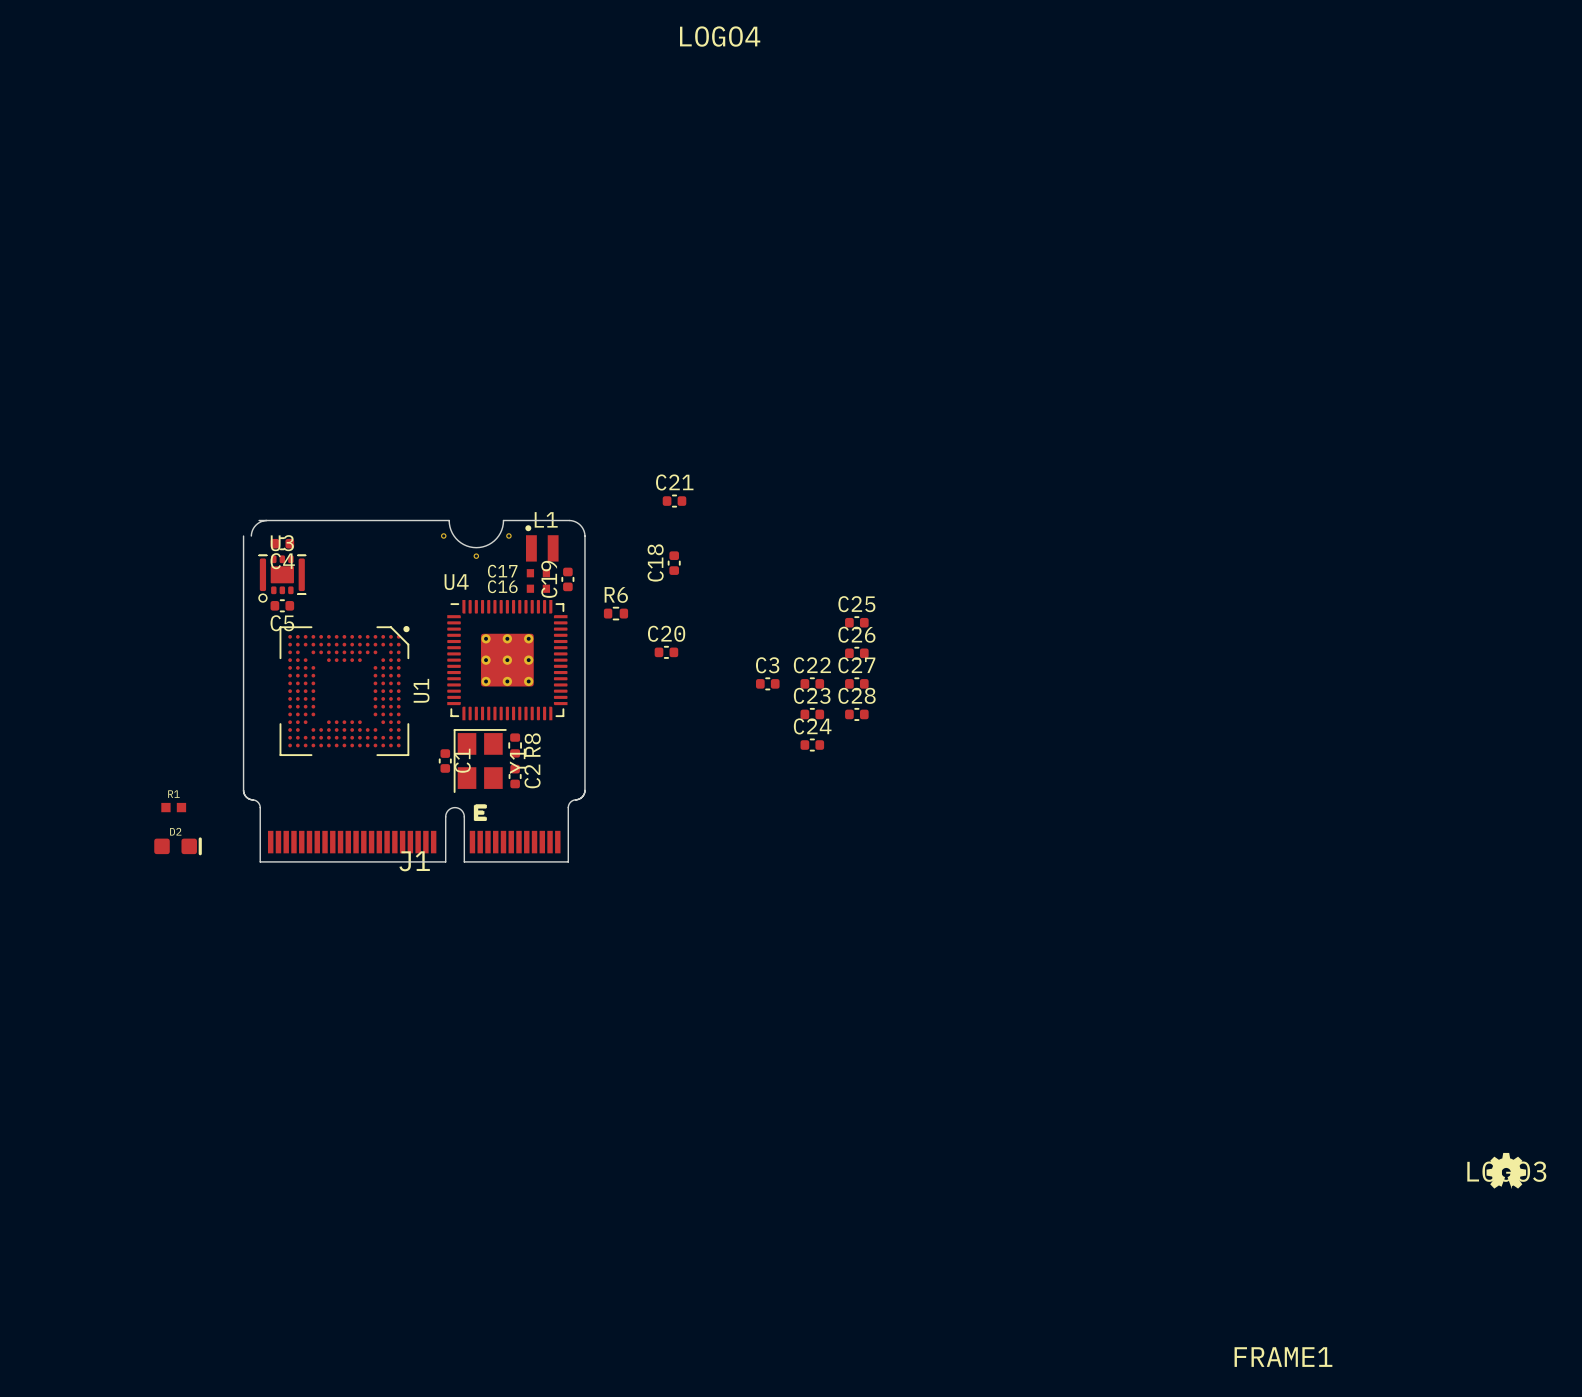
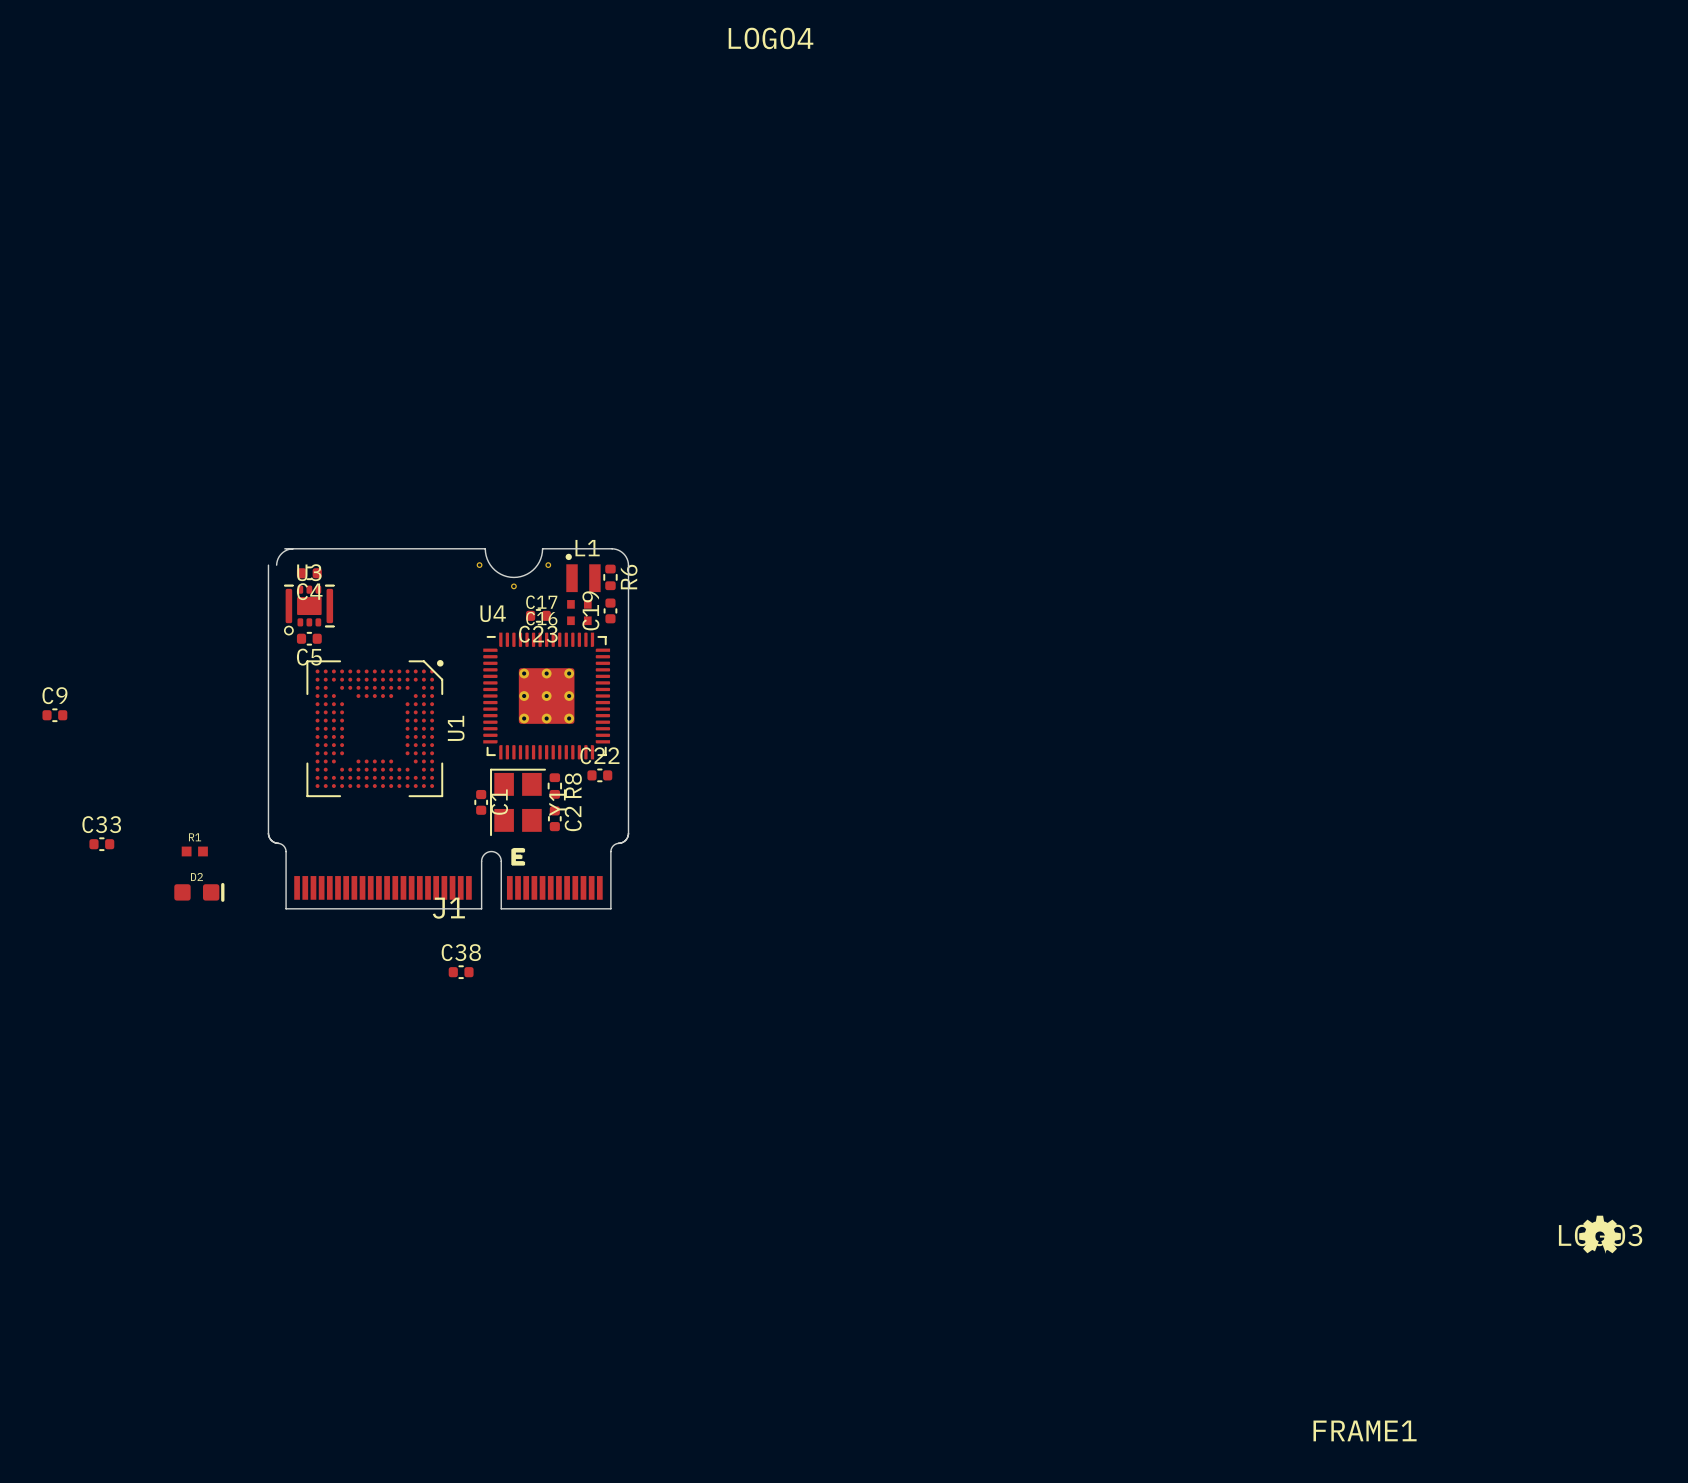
C21: (674, 501) -> none
C18: (674, 563) -> none
R6 rotation: 0° (616, 613) -> 90° clockwise (610, 577)
R6 position: (616, 613) -> (610, 577)
C25: (856, 622) -> none
C20: (666, 652) -> none
C26: (856, 653) -> none
C9: none -> (54, 715)
C3: (767, 683) -> none
C22 position: (812, 683) -> (599, 775)
C27: (856, 683) -> none
C23 name position: C23 (812, 695) -> C23 (538, 634)
C23 position: (812, 714) -> (538, 615)
C28: (856, 714) -> none
C24: (812, 745) -> none
C33: none -> (101, 844)
C38: none -> (461, 972)

